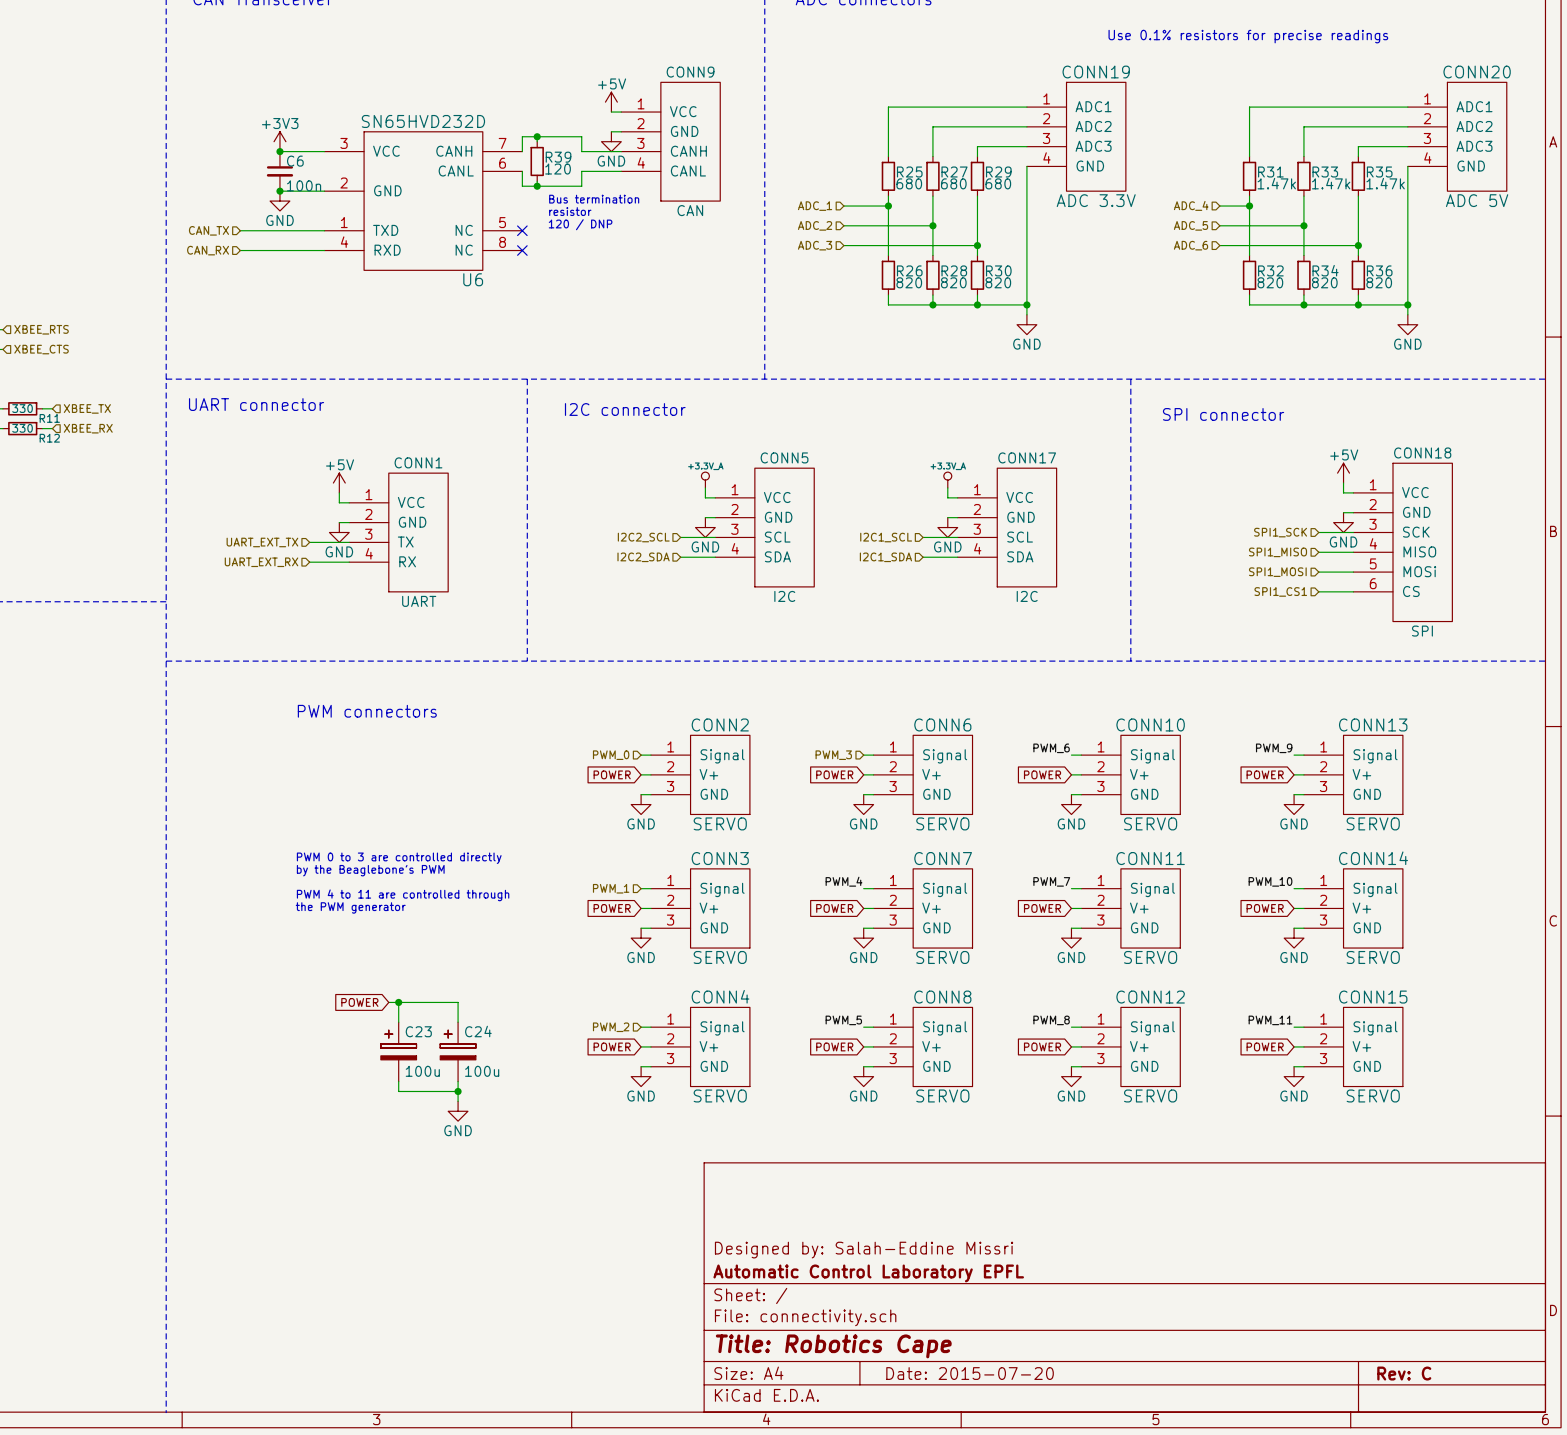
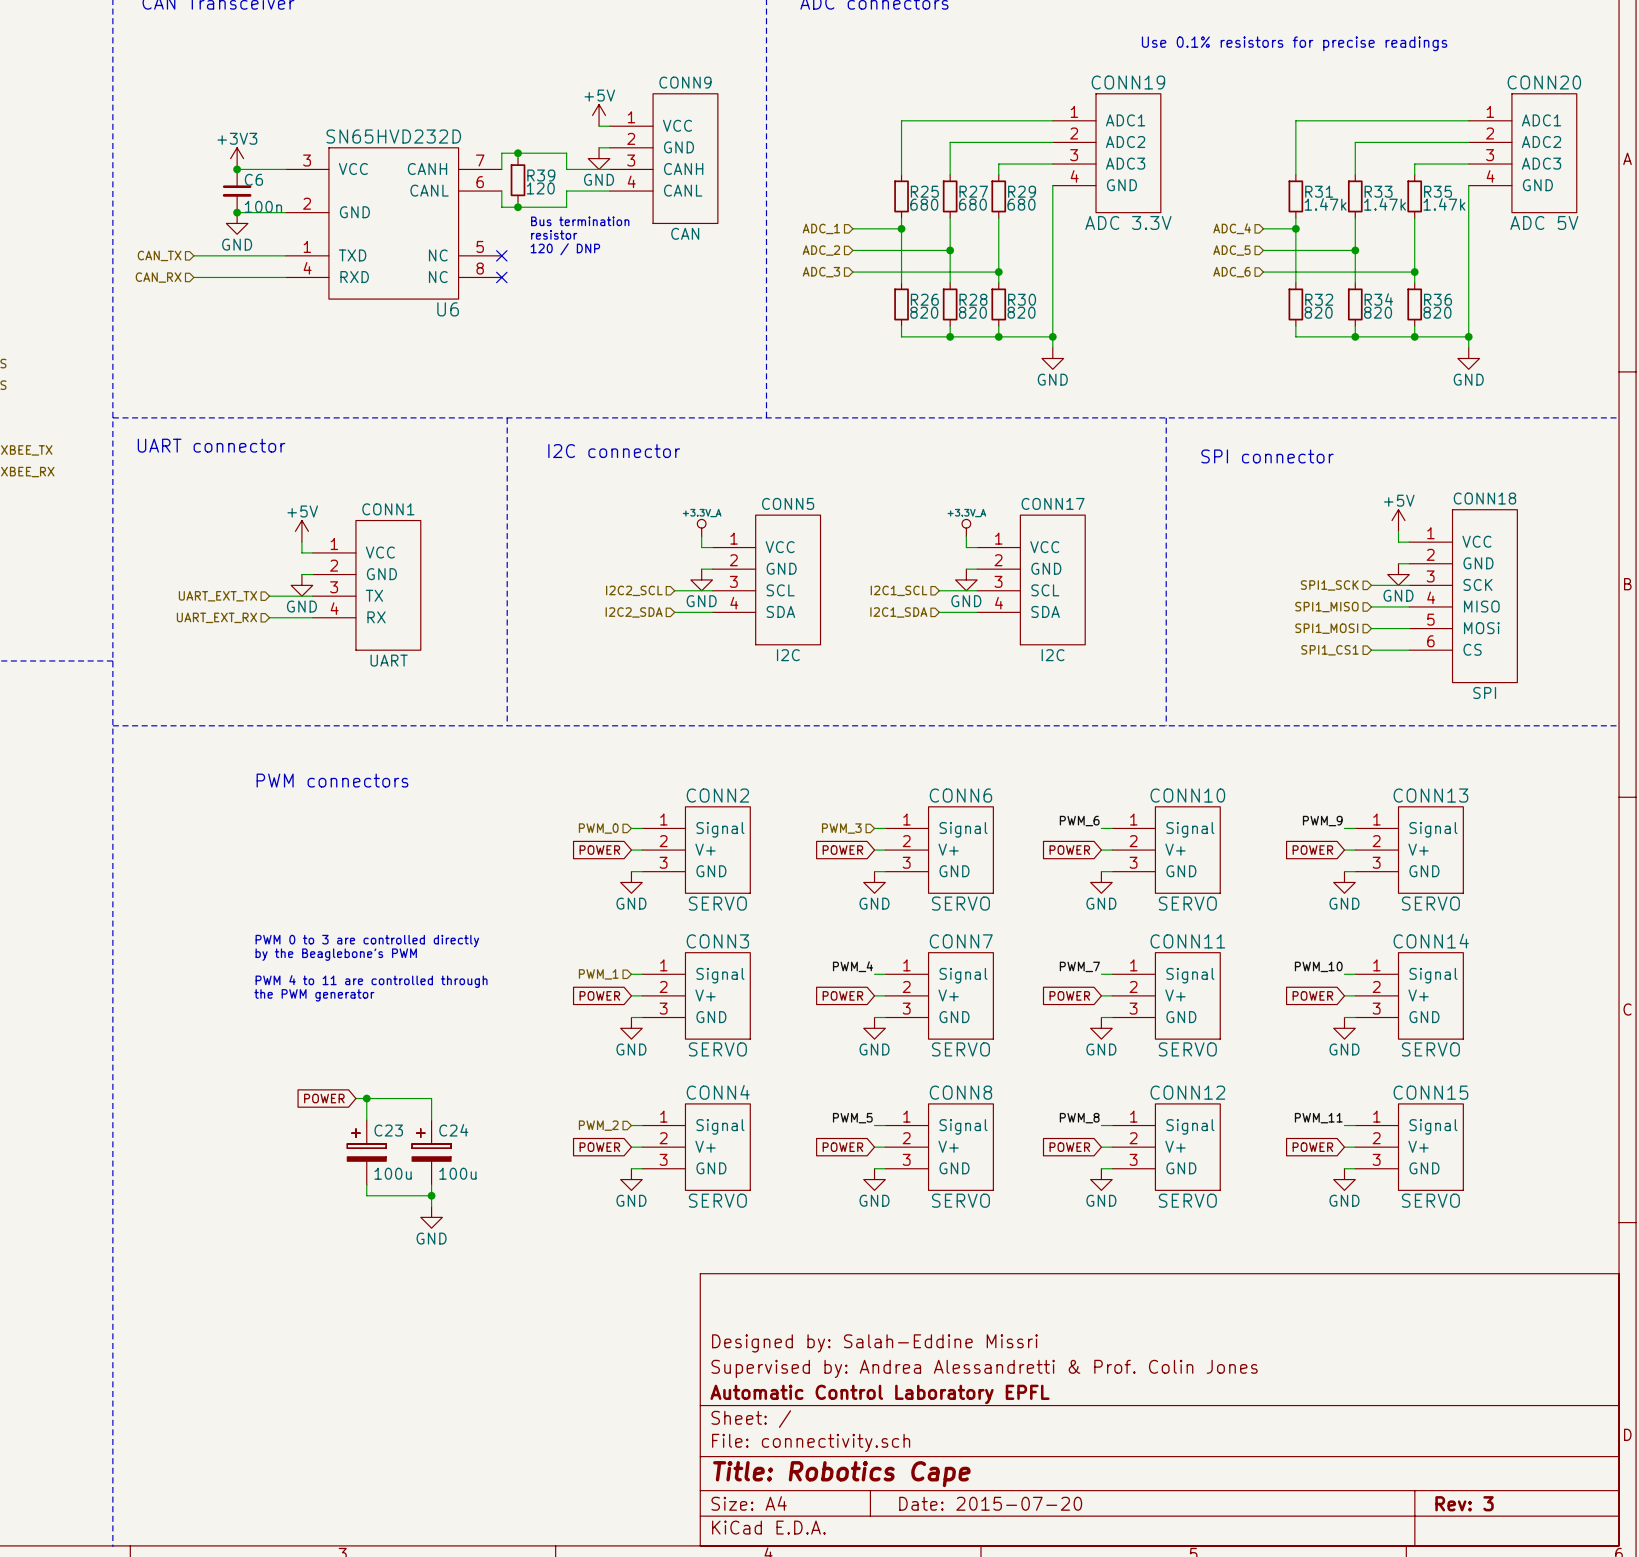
title block: none -> Designed by: Salah-Eddine Missri (874, 1343)
title block: Designed by: Salah-Eddine Missri (864, 1250) -> Supervised by: Andrea Alessandretti & Prof. Colin Jones (984, 1368)
title block: Rev: C (1404, 1373) -> Rev: 3 (1464, 1503)

